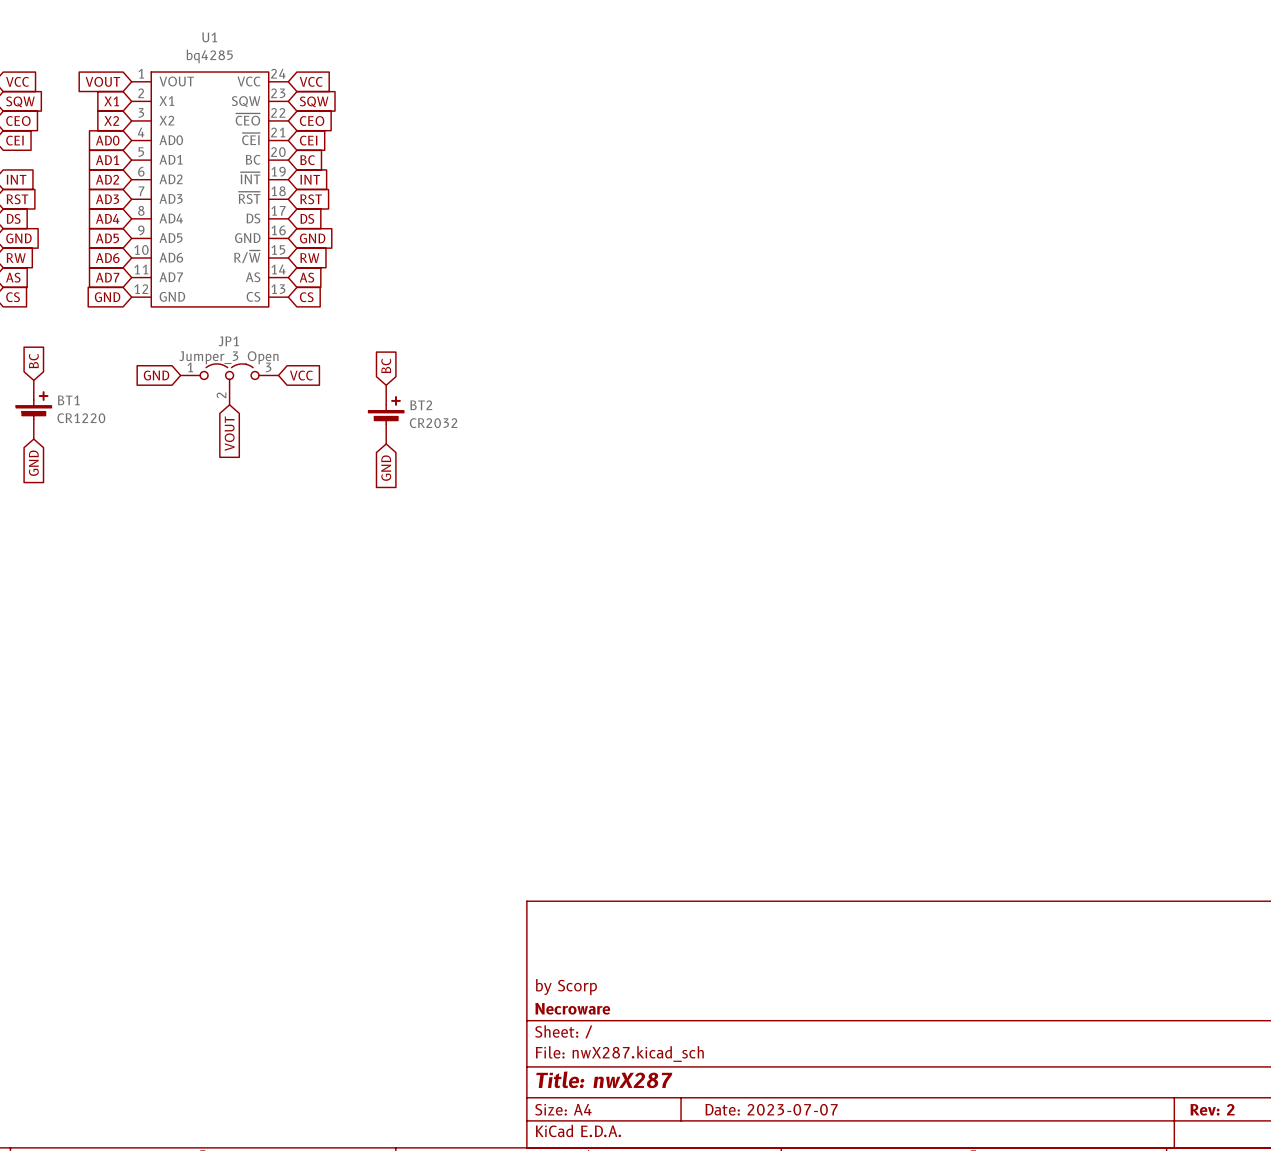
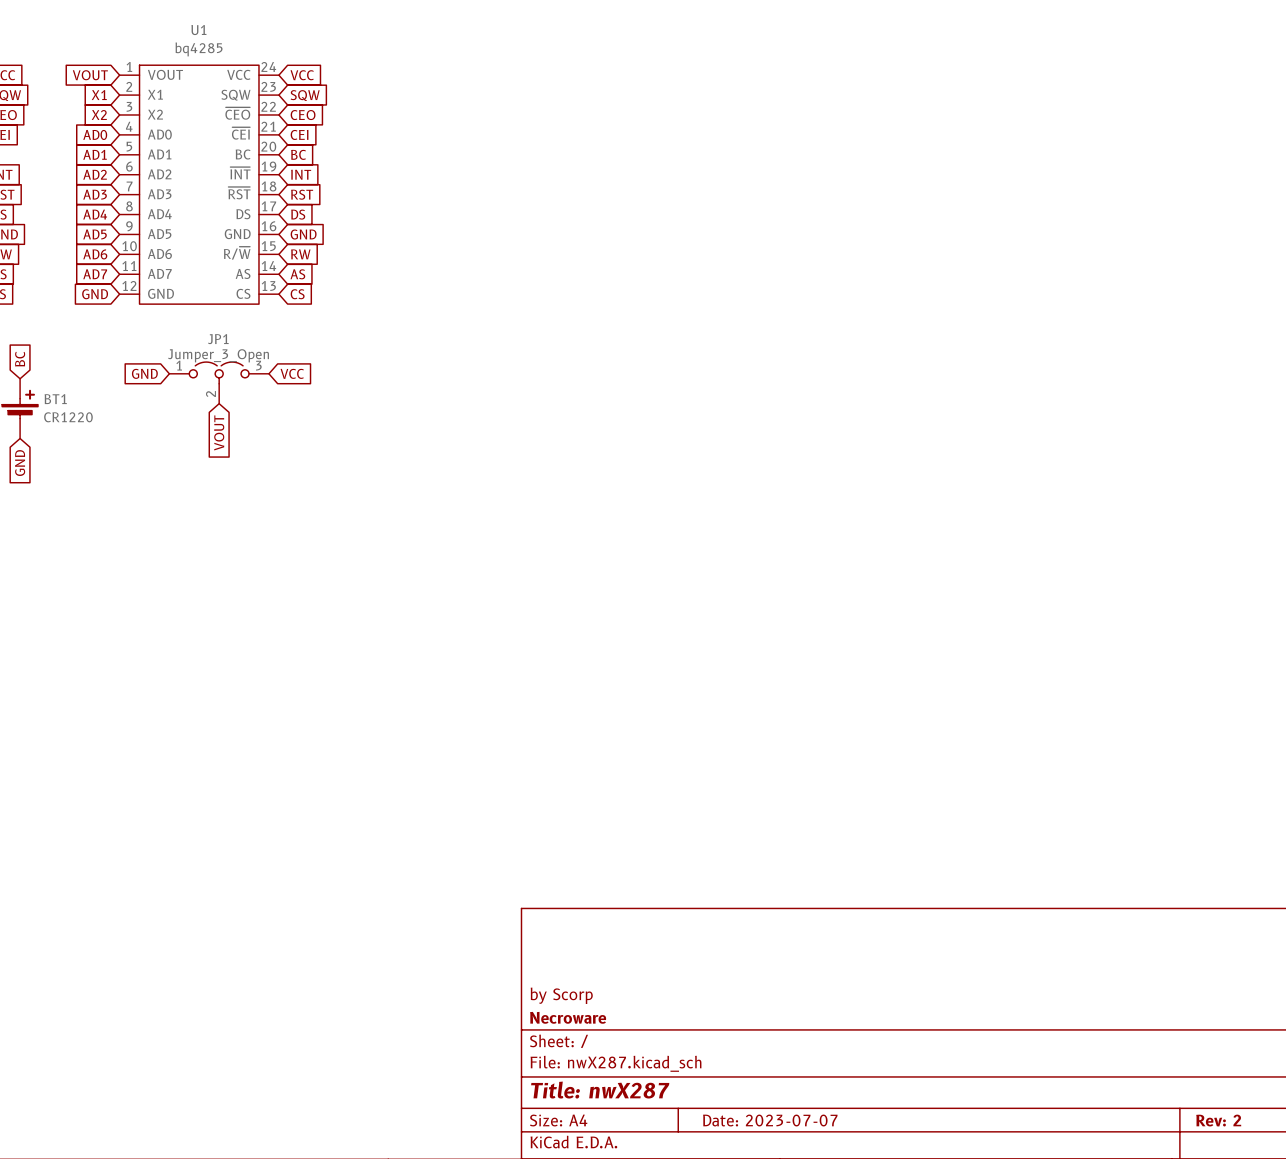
global label: BC (386, 365) -> none
BT2: CR2032 (386, 414) -> none
global label: GND (386, 468) -> none

